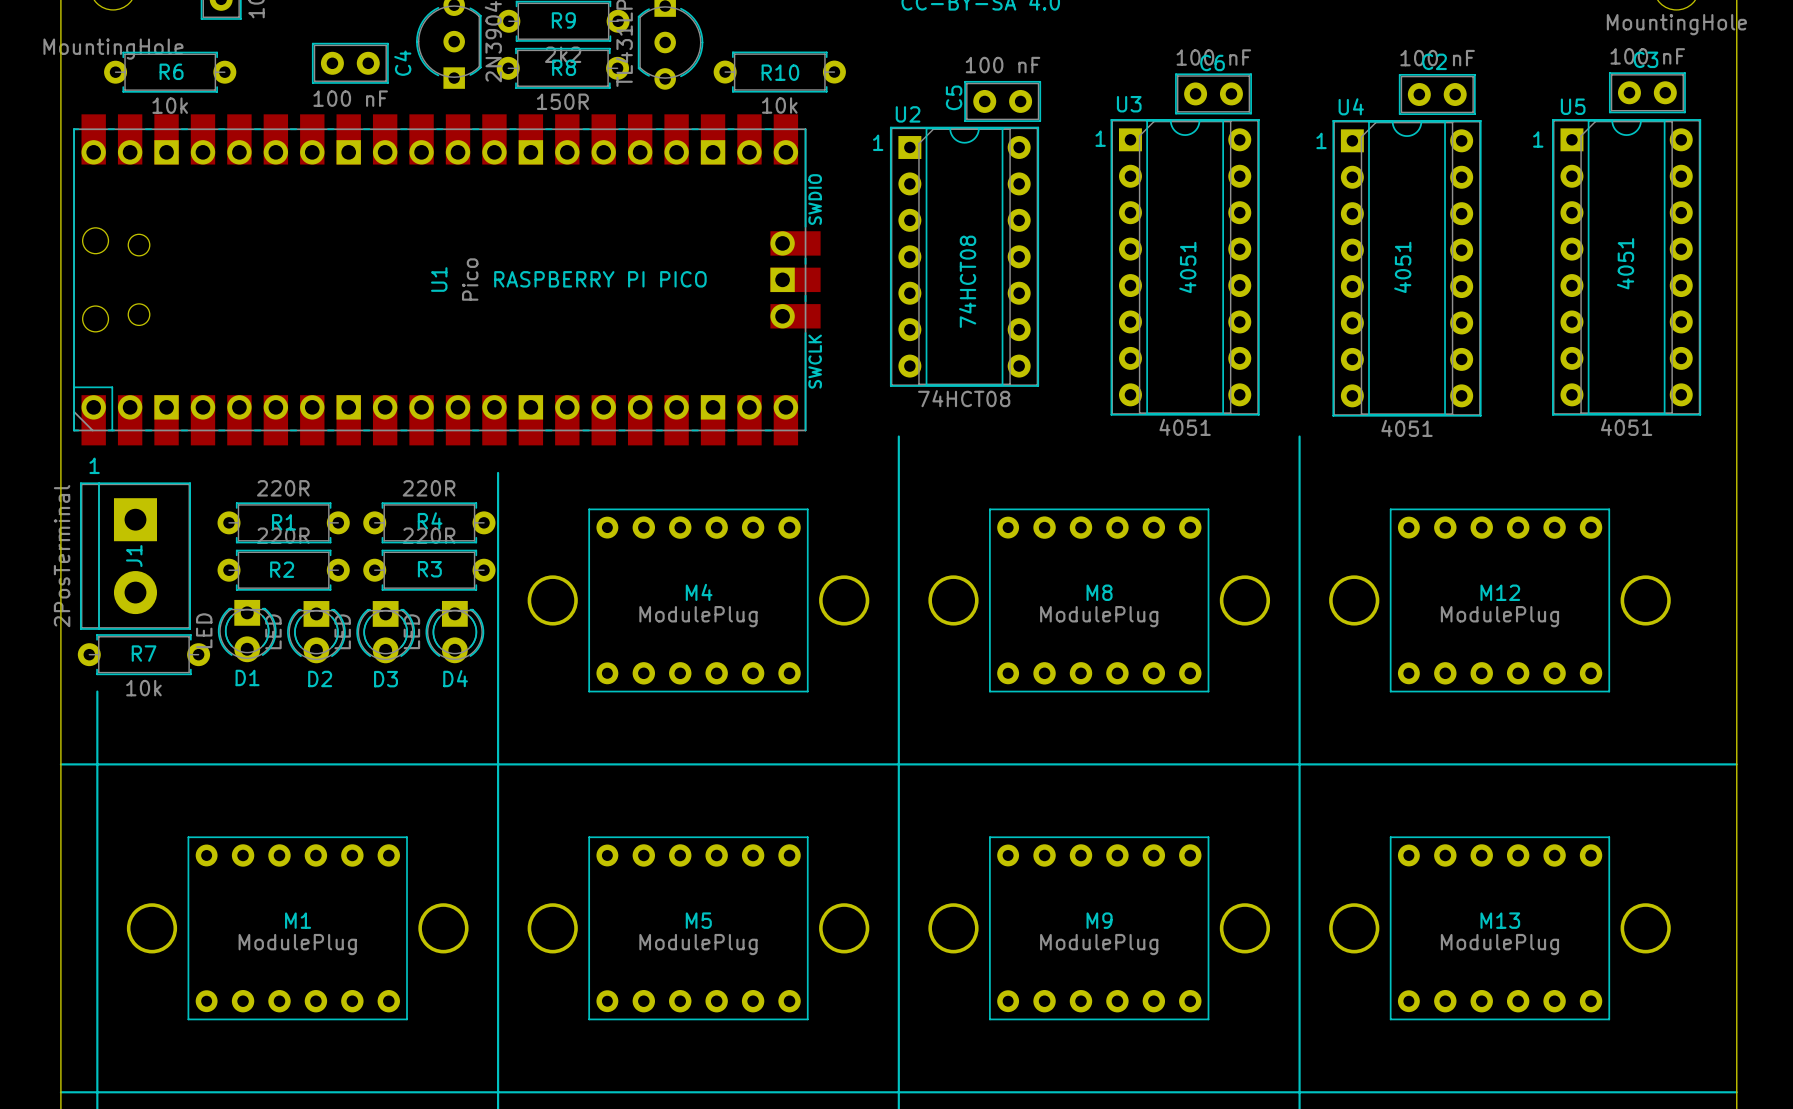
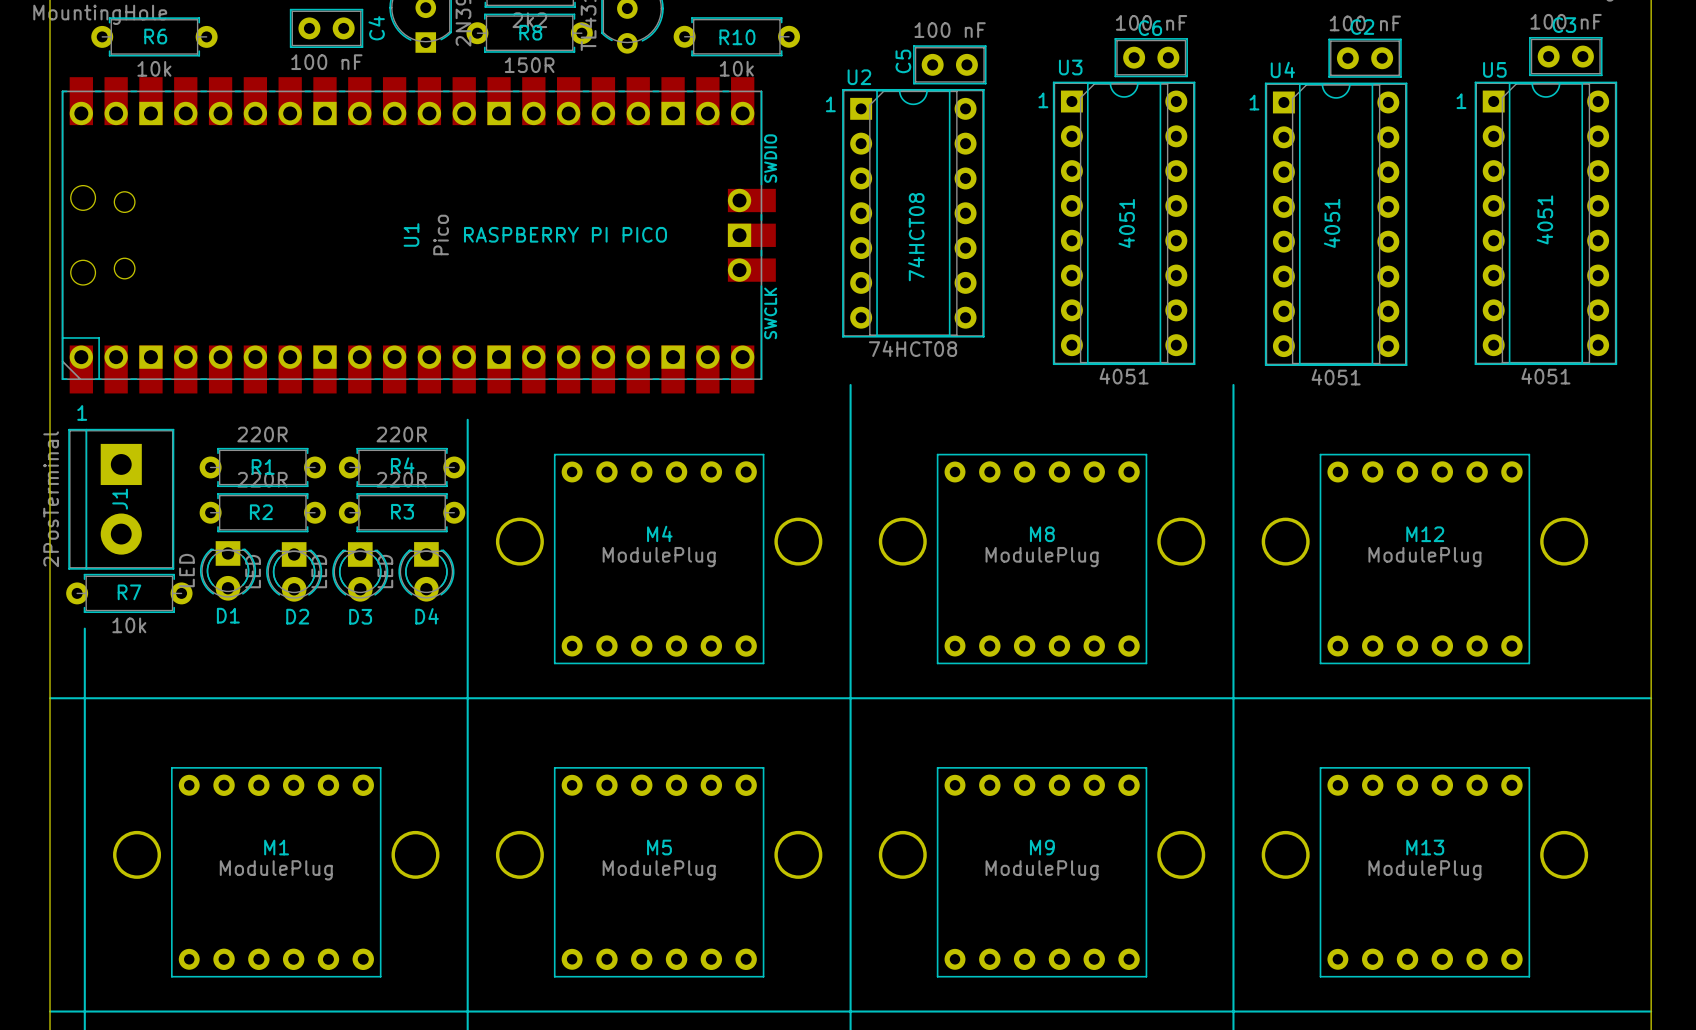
M4 footprint: [527, 508, 870, 693] -> [495, 453, 823, 665]
M8 footprint: [928, 508, 1271, 693] -> [878, 453, 1206, 665]
M12 footprint: [1329, 508, 1671, 693] -> [1261, 453, 1589, 665]
M1 footprint: [126, 836, 469, 1021] -> [113, 767, 440, 978]
M5 footprint: [527, 836, 870, 1021] -> [495, 767, 823, 978]
M9 footprint: [928, 836, 1271, 1021] -> [878, 767, 1206, 978]
M13 footprint: [1329, 836, 1671, 1021] -> [1261, 767, 1589, 978]

